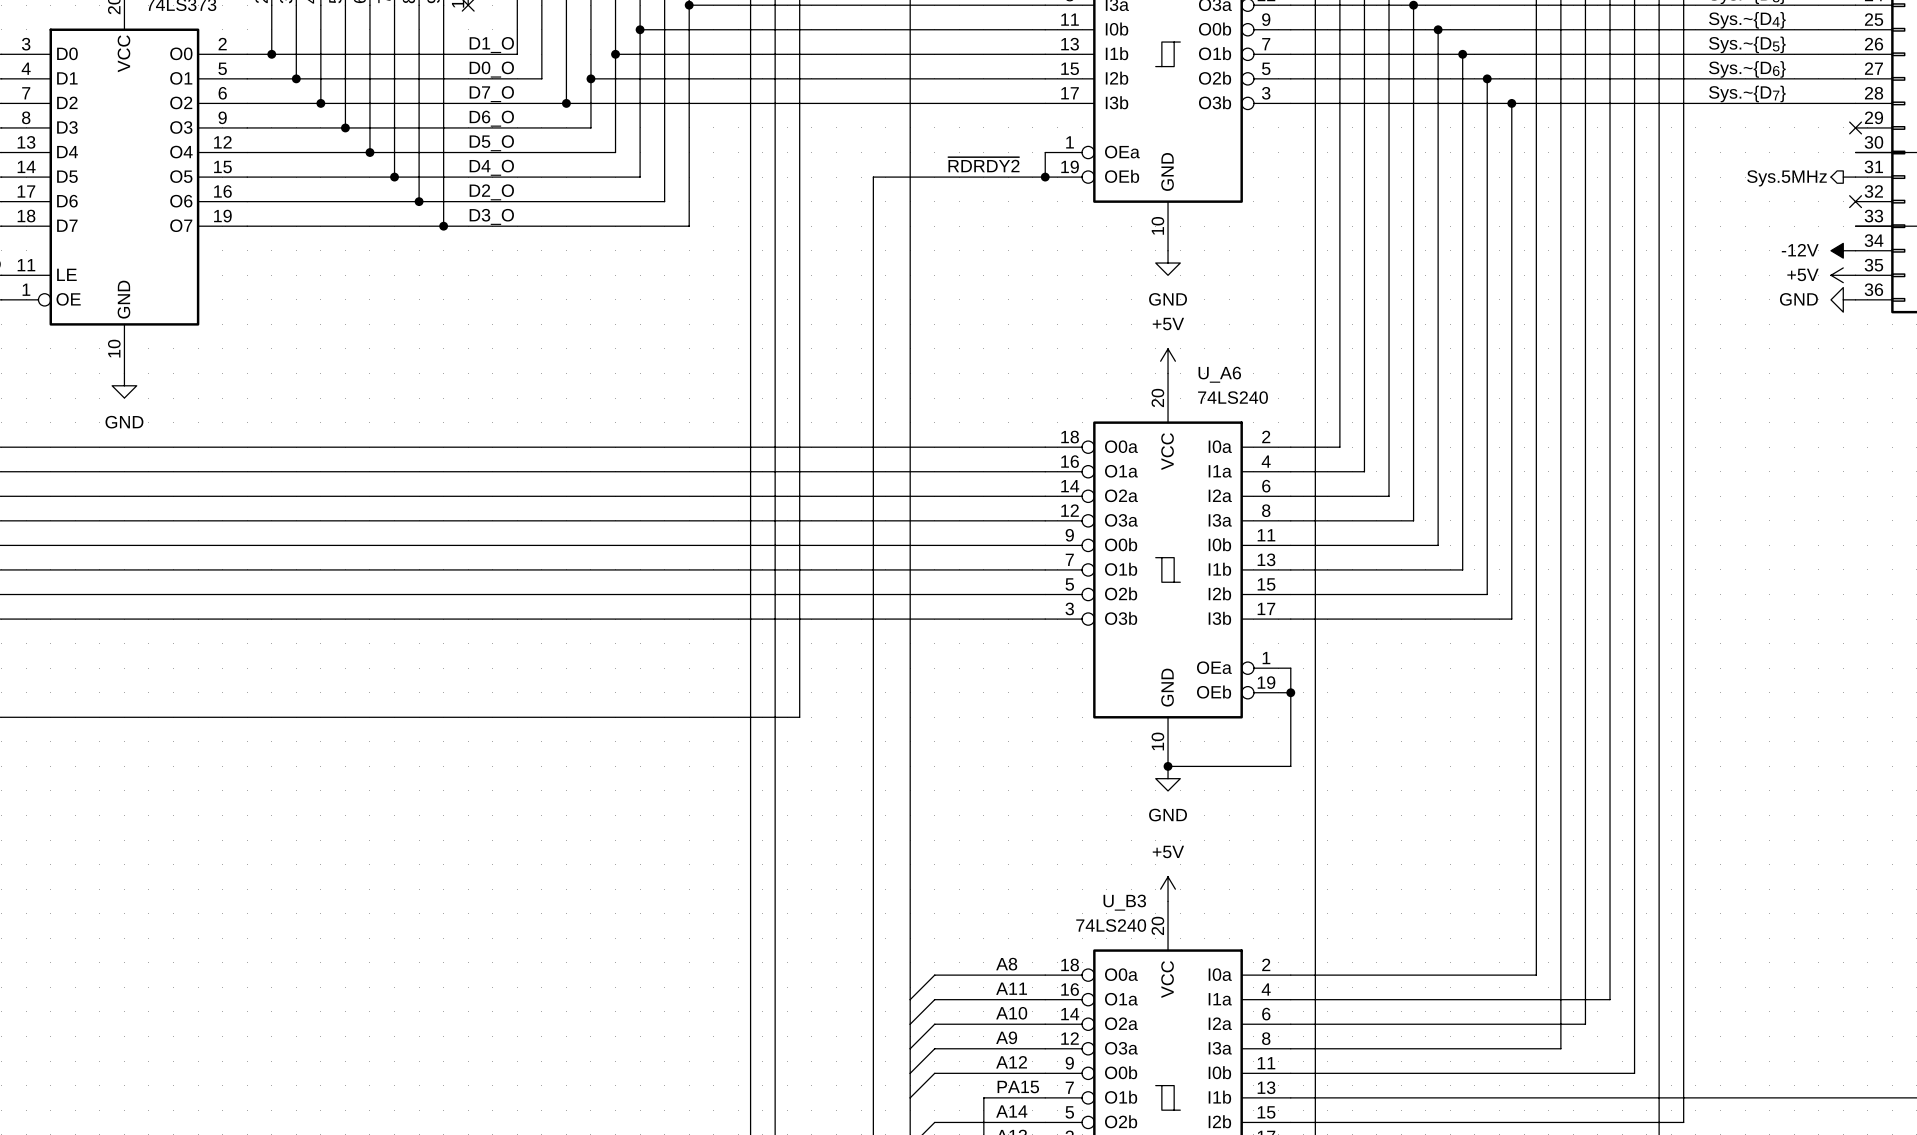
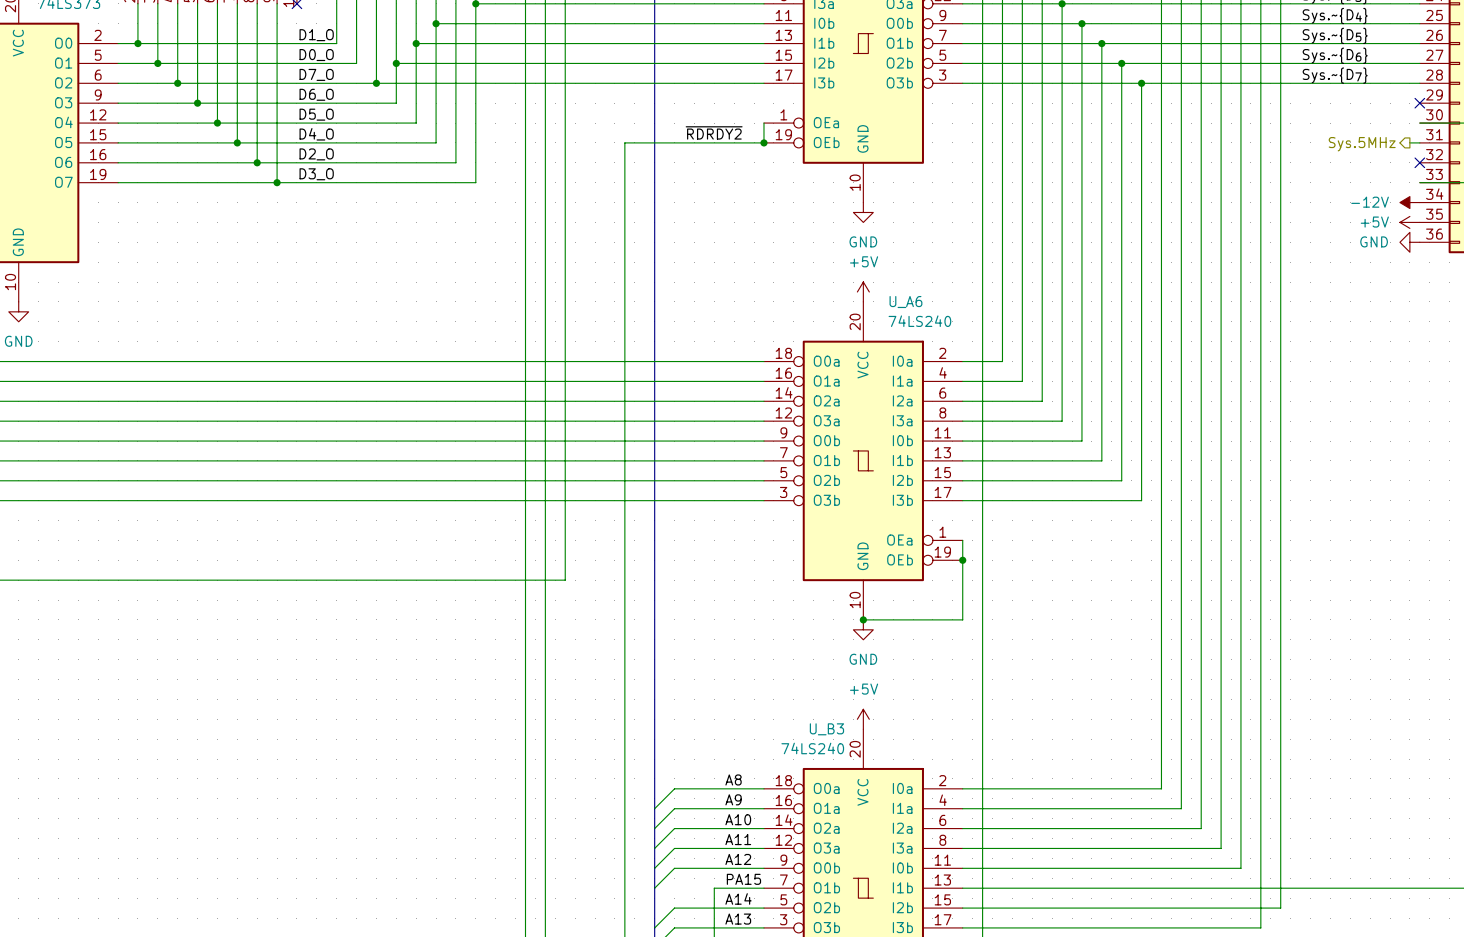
label: A11 (1011, 988) -> A9 (733, 799)
wire: (1610, 999) (1560, 999) (1560, 1048) -> (1221, 808) (1221, 848) (1181, 848)
label: A9 (1006, 1037) -> A11 (738, 839)

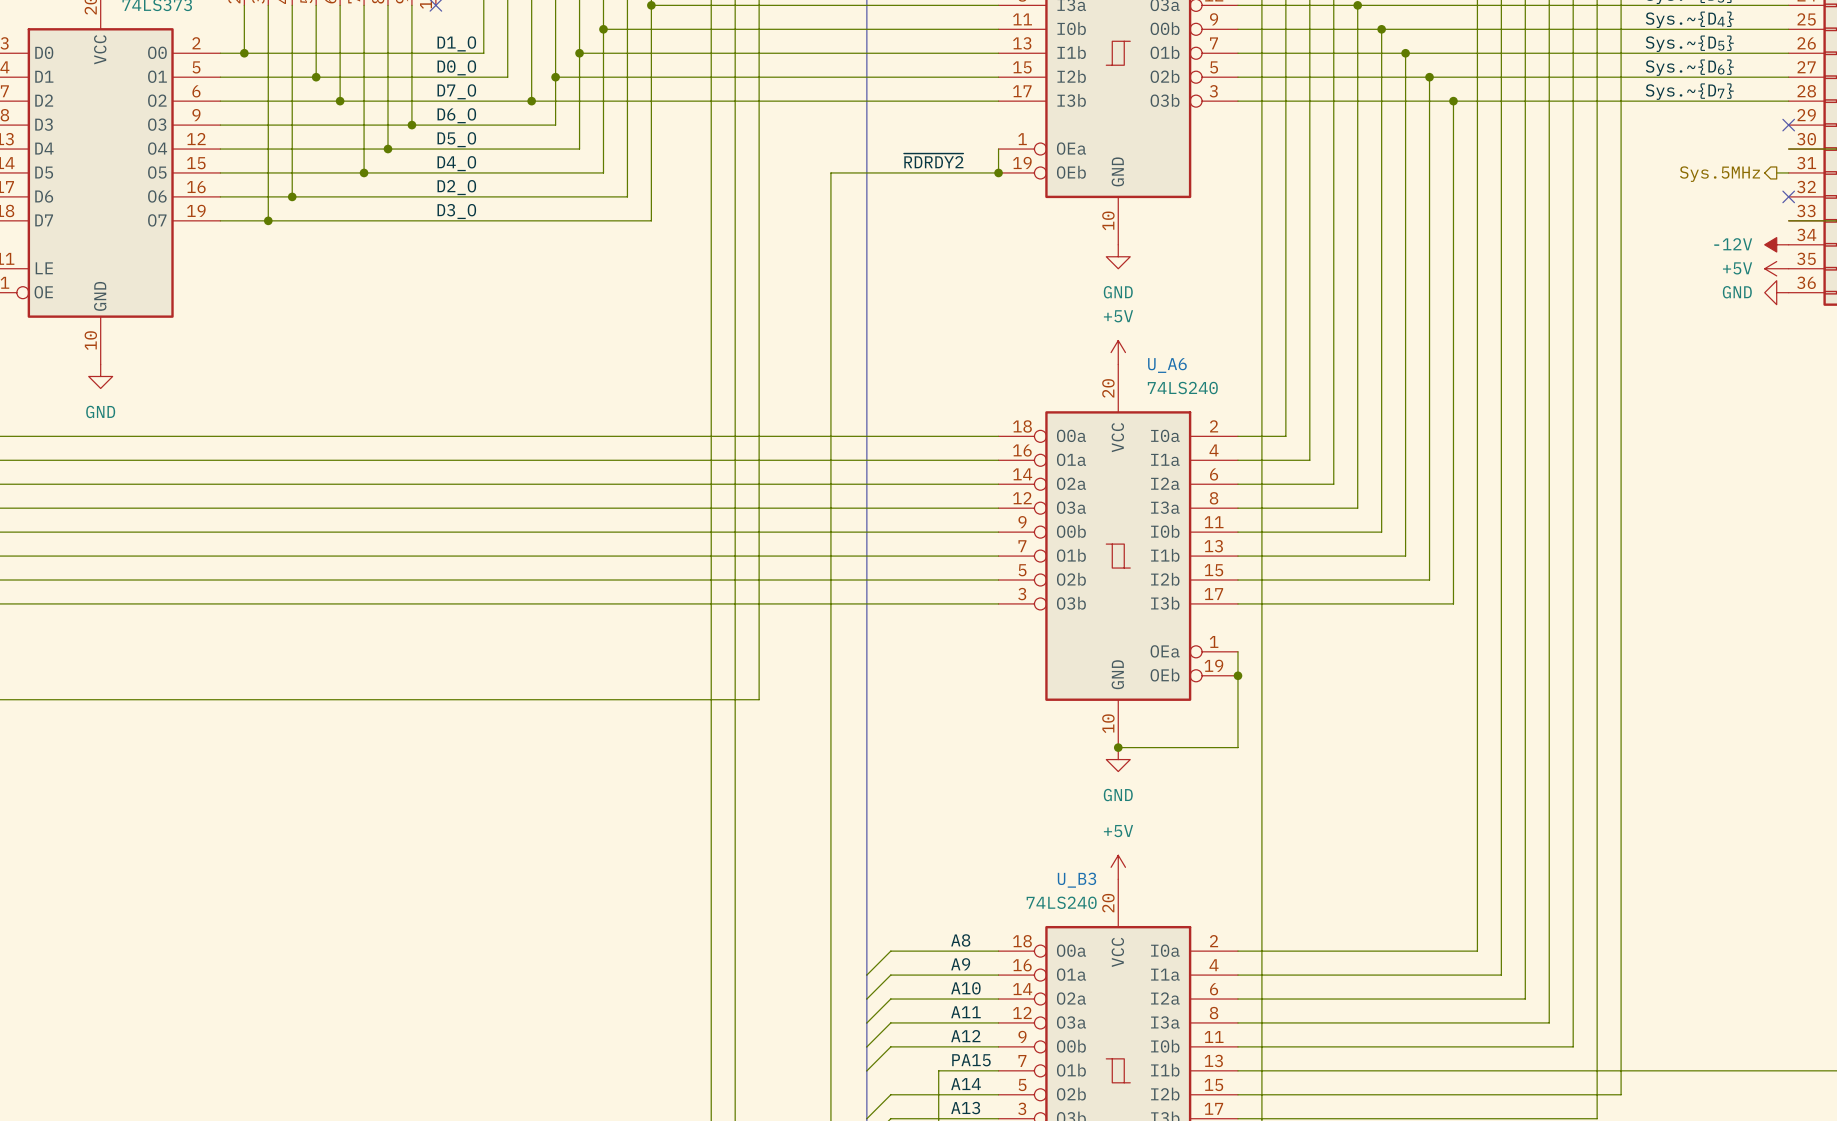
wire: none -> (268, 77) (268, 220)
junction: (157, 63) -> none
wire: (197, 63) (197, 103) -> none
junction: none -> (316, 77)
junction: (177, 83) -> none
wire: (217, 83) (217, 123) -> none
junction: none -> (340, 101)
junction: (197, 103) -> none
wire: (277, 103) (277, 182) -> (292, 101) (292, 196)
junction: none -> (411, 125)
junction: (217, 123) -> none
wire: (257, 123) (257, 162) -> none
junction: none -> (388, 149)
junction: none -> (292, 196)
junction: (257, 162) -> none
junction: none -> (268, 220)
junction: (277, 182) -> none

